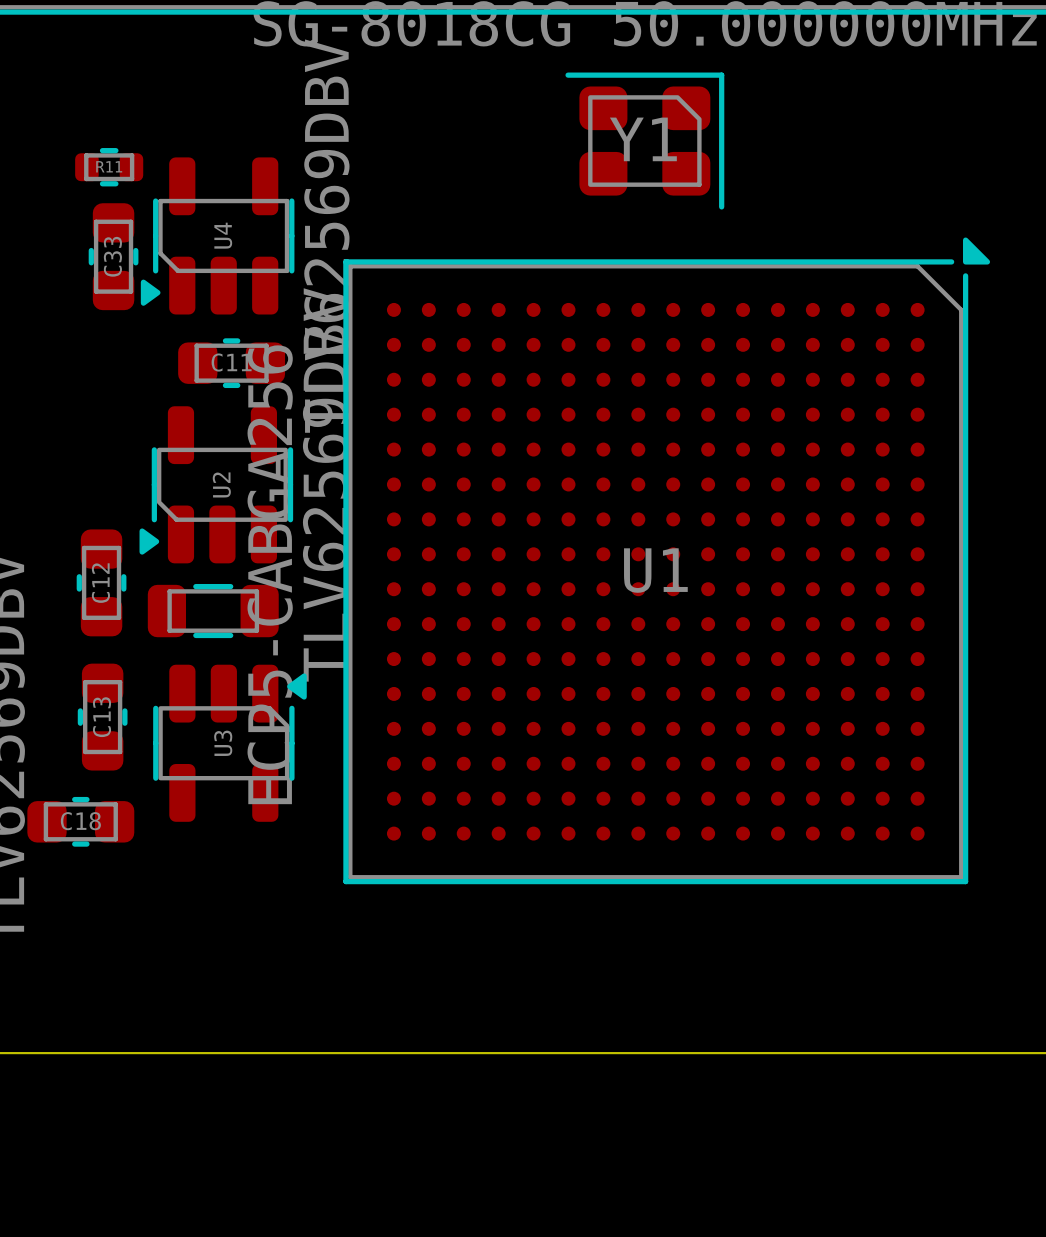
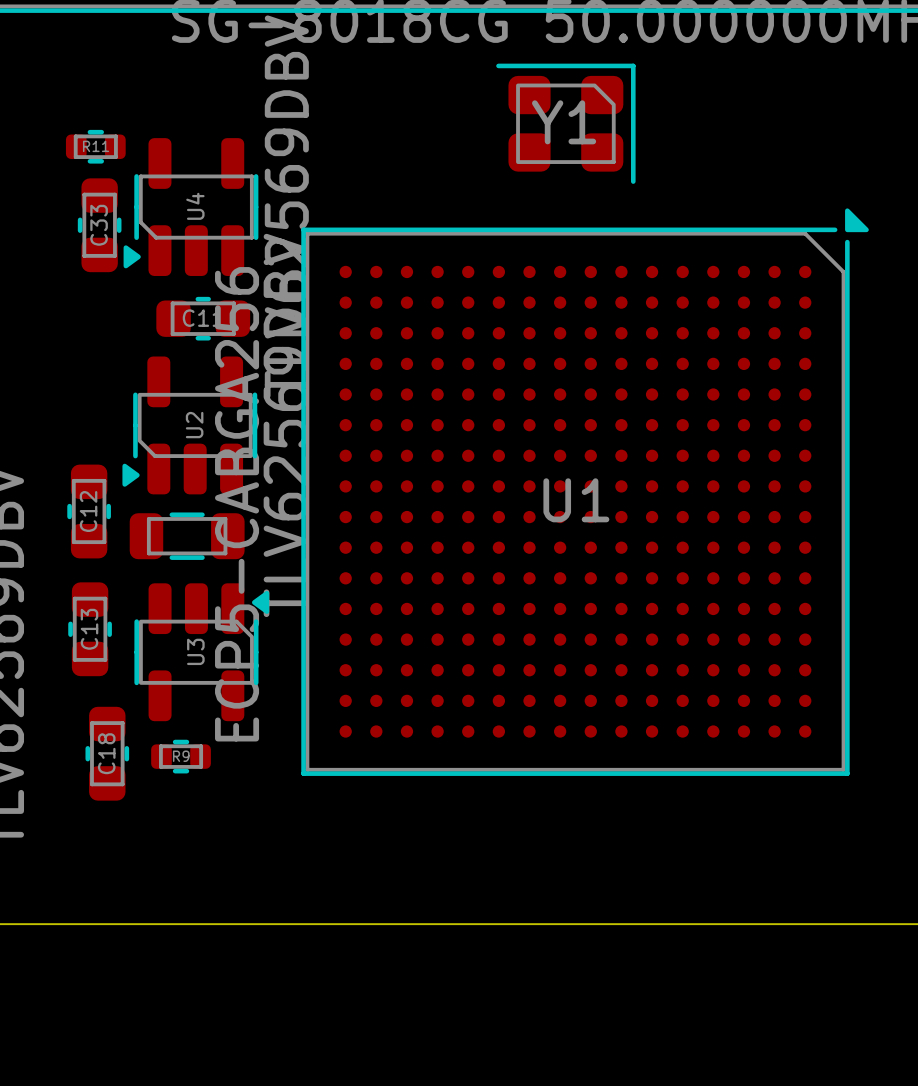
C18 rotation: 0° (80, 821) -> 90° clockwise (107, 753)
R9: none -> (181, 756)

